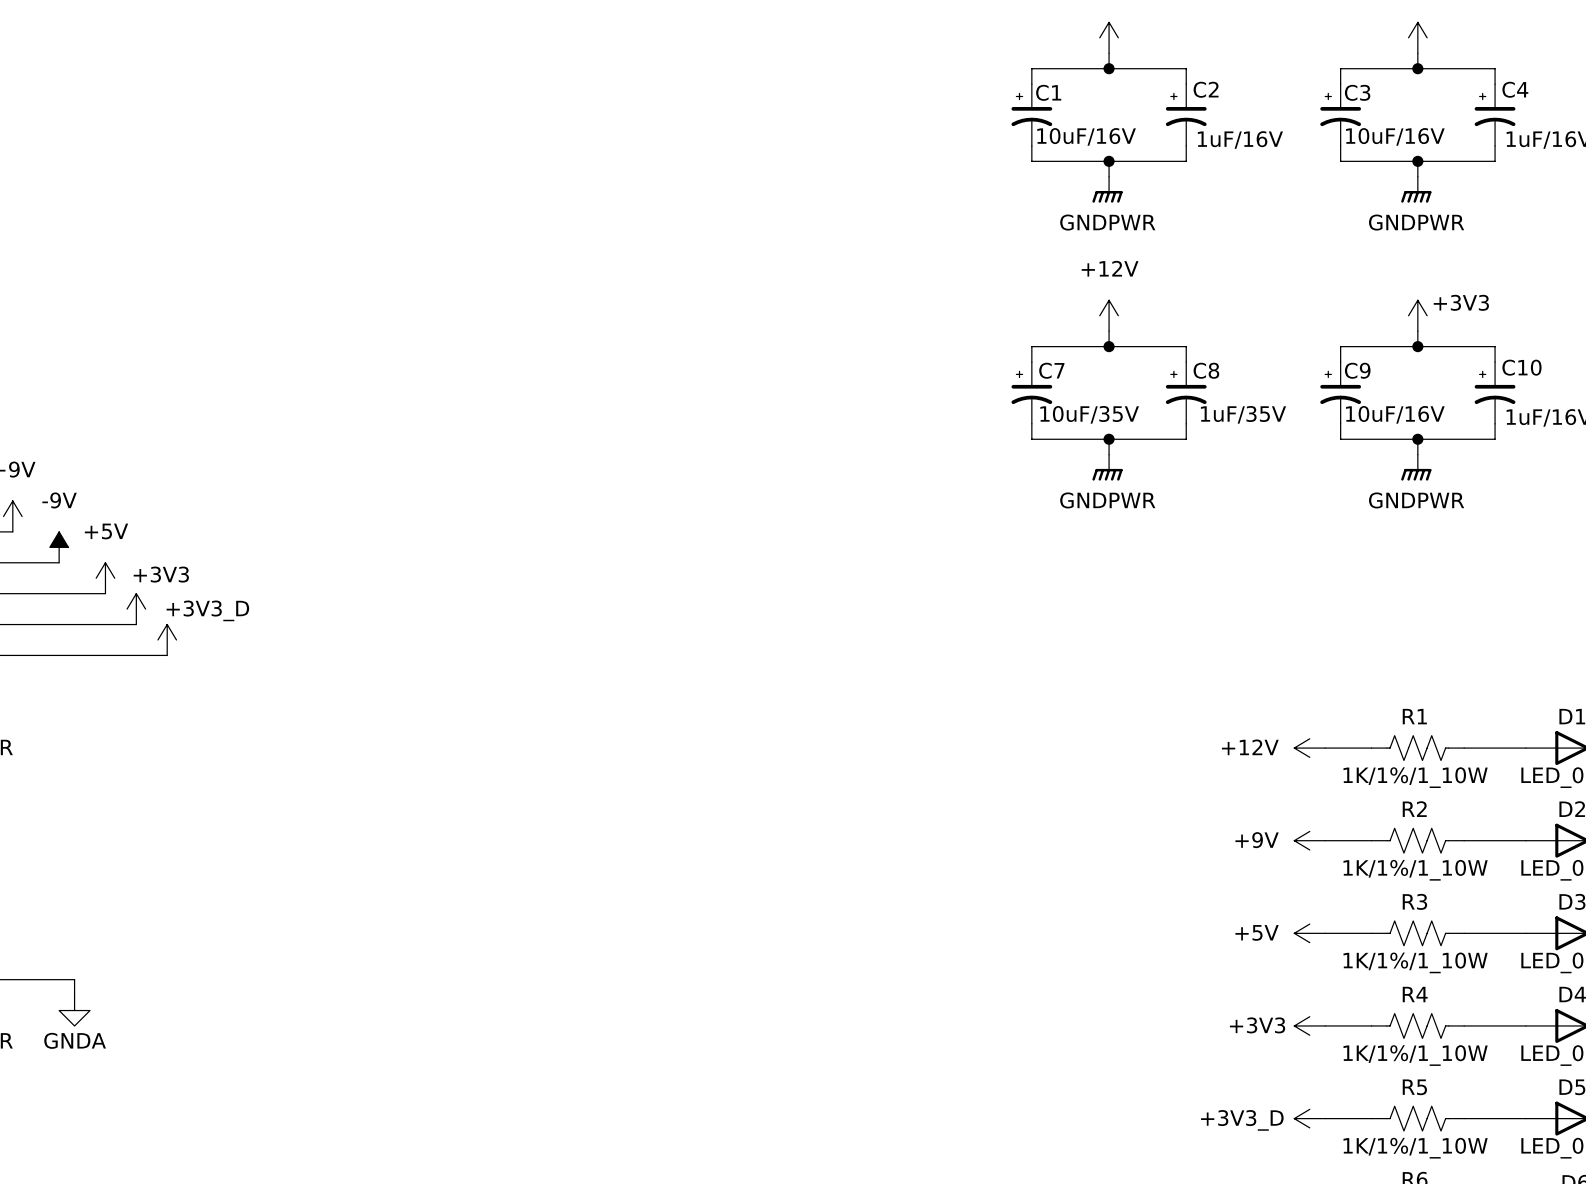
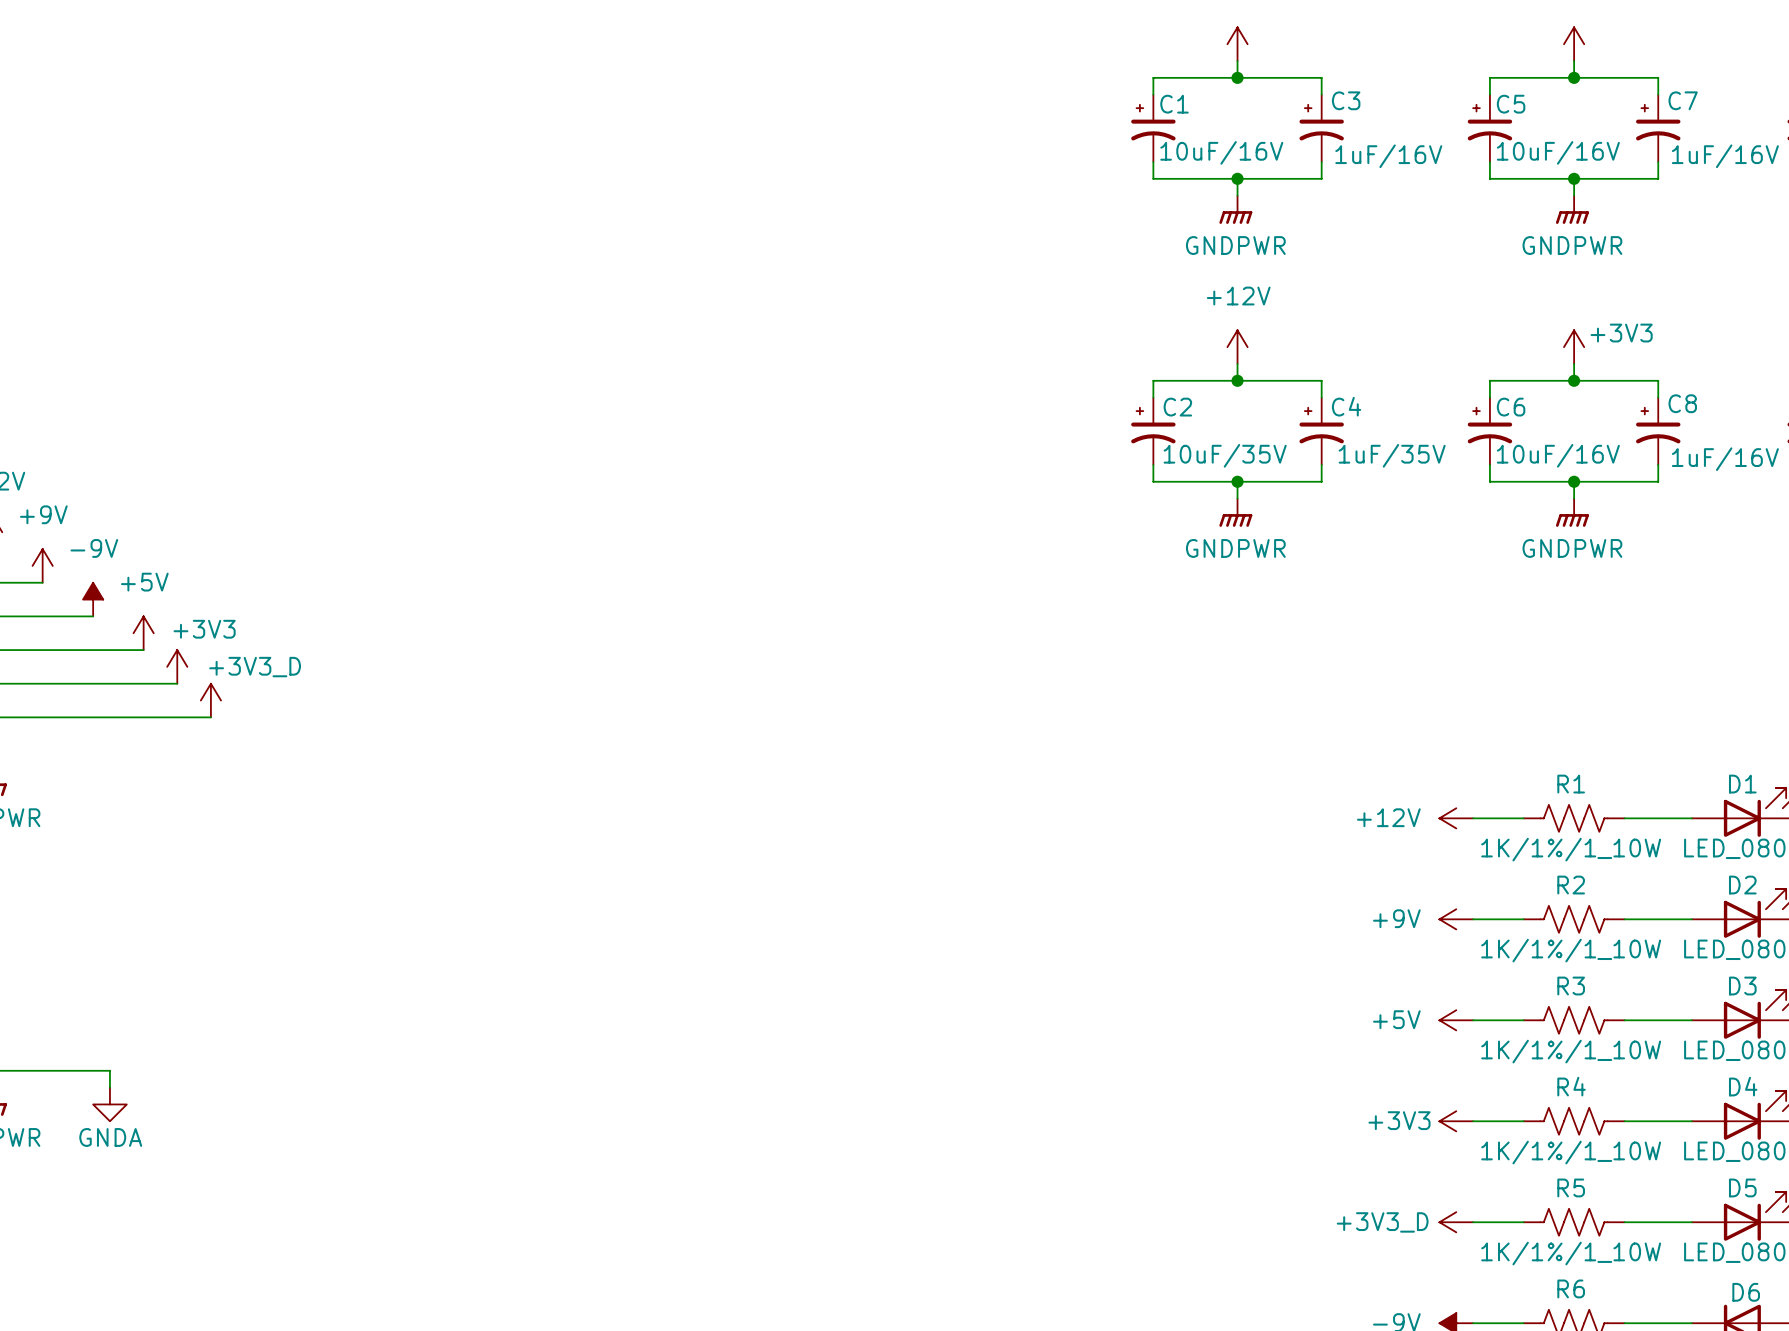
C2 name: C2 (1206, 89) -> C3 (1346, 100)
C4 name: C4 (1515, 89) -> C7 (1683, 100)
C3 name: C3 (1357, 92) -> C5 (1511, 104)
C10 name: C10 (1521, 367) -> C8 (1682, 403)
C7 name: C7 (1051, 370) -> C2 (1177, 407)
C8 name: C8 (1206, 370) -> C4 (1346, 406)
C9 name: C9 (1357, 370) -> C6 (1511, 407)

